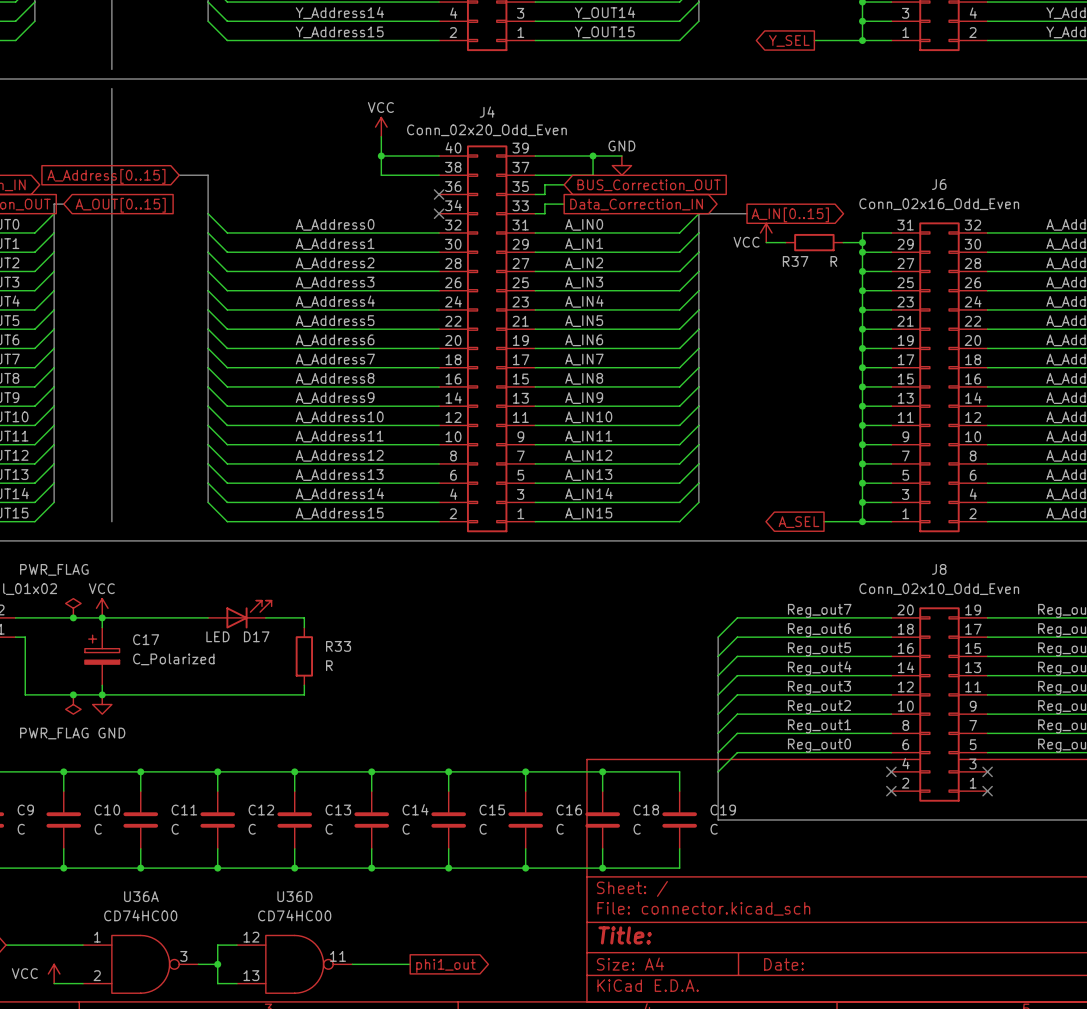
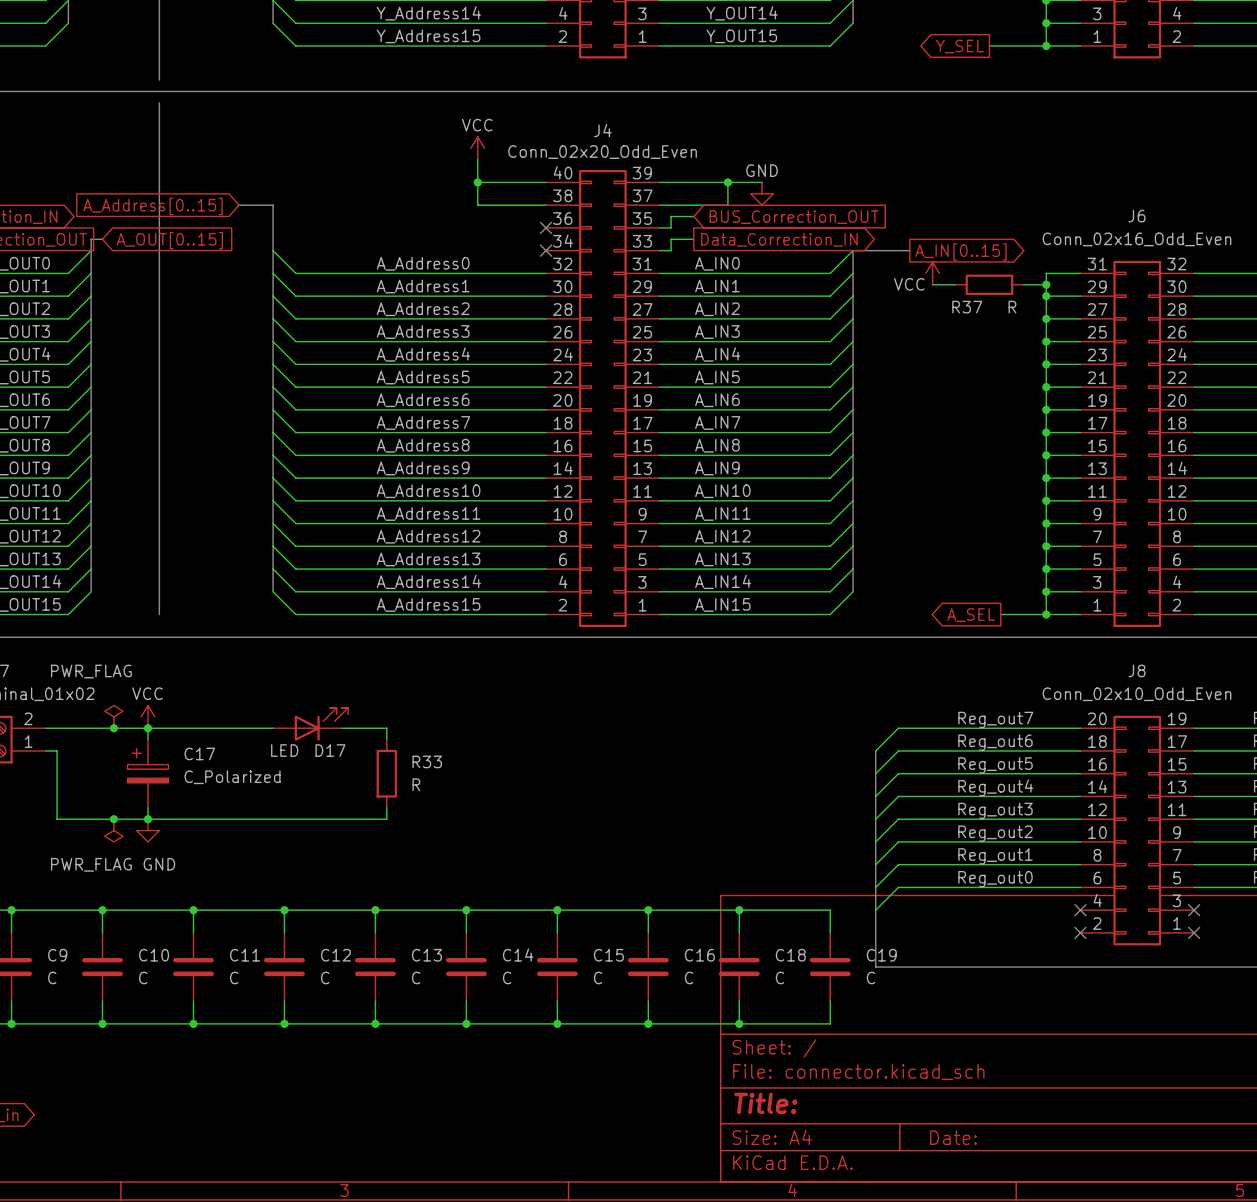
wire: (6, 945) (83, 945) -> none
wire: (236, 945) (217, 945) (217, 983) (236, 983) -> none
U36A: CD74HC00 (140, 964) -> none
wire: (198, 964) (217, 964) -> none
junction: (217, 964) -> none
U36D: CD74HC00 (294, 964) -> none
wire: (352, 964) (410, 964) -> none
global label: phi1_out (445, 965) -> none
power symbol: VCC (54, 973) -> none
wire: (54, 983) (83, 983) -> none

